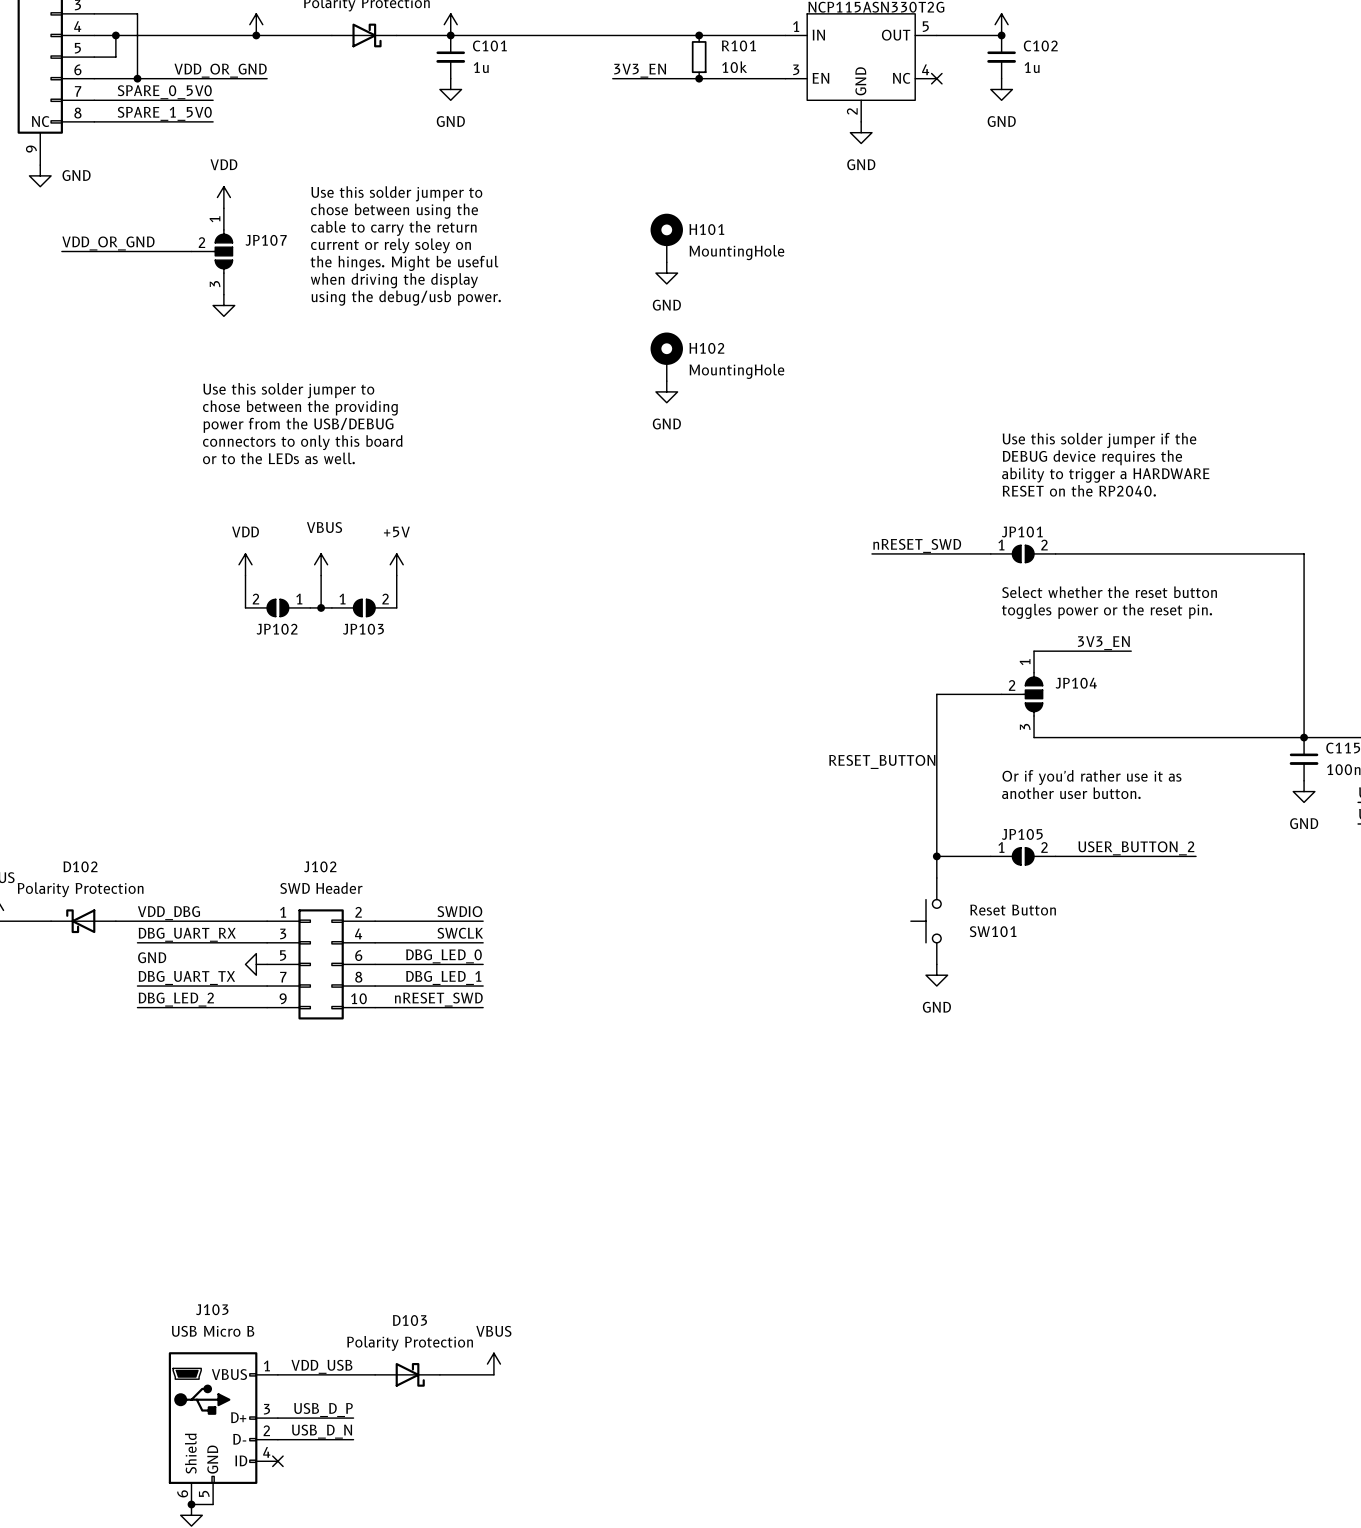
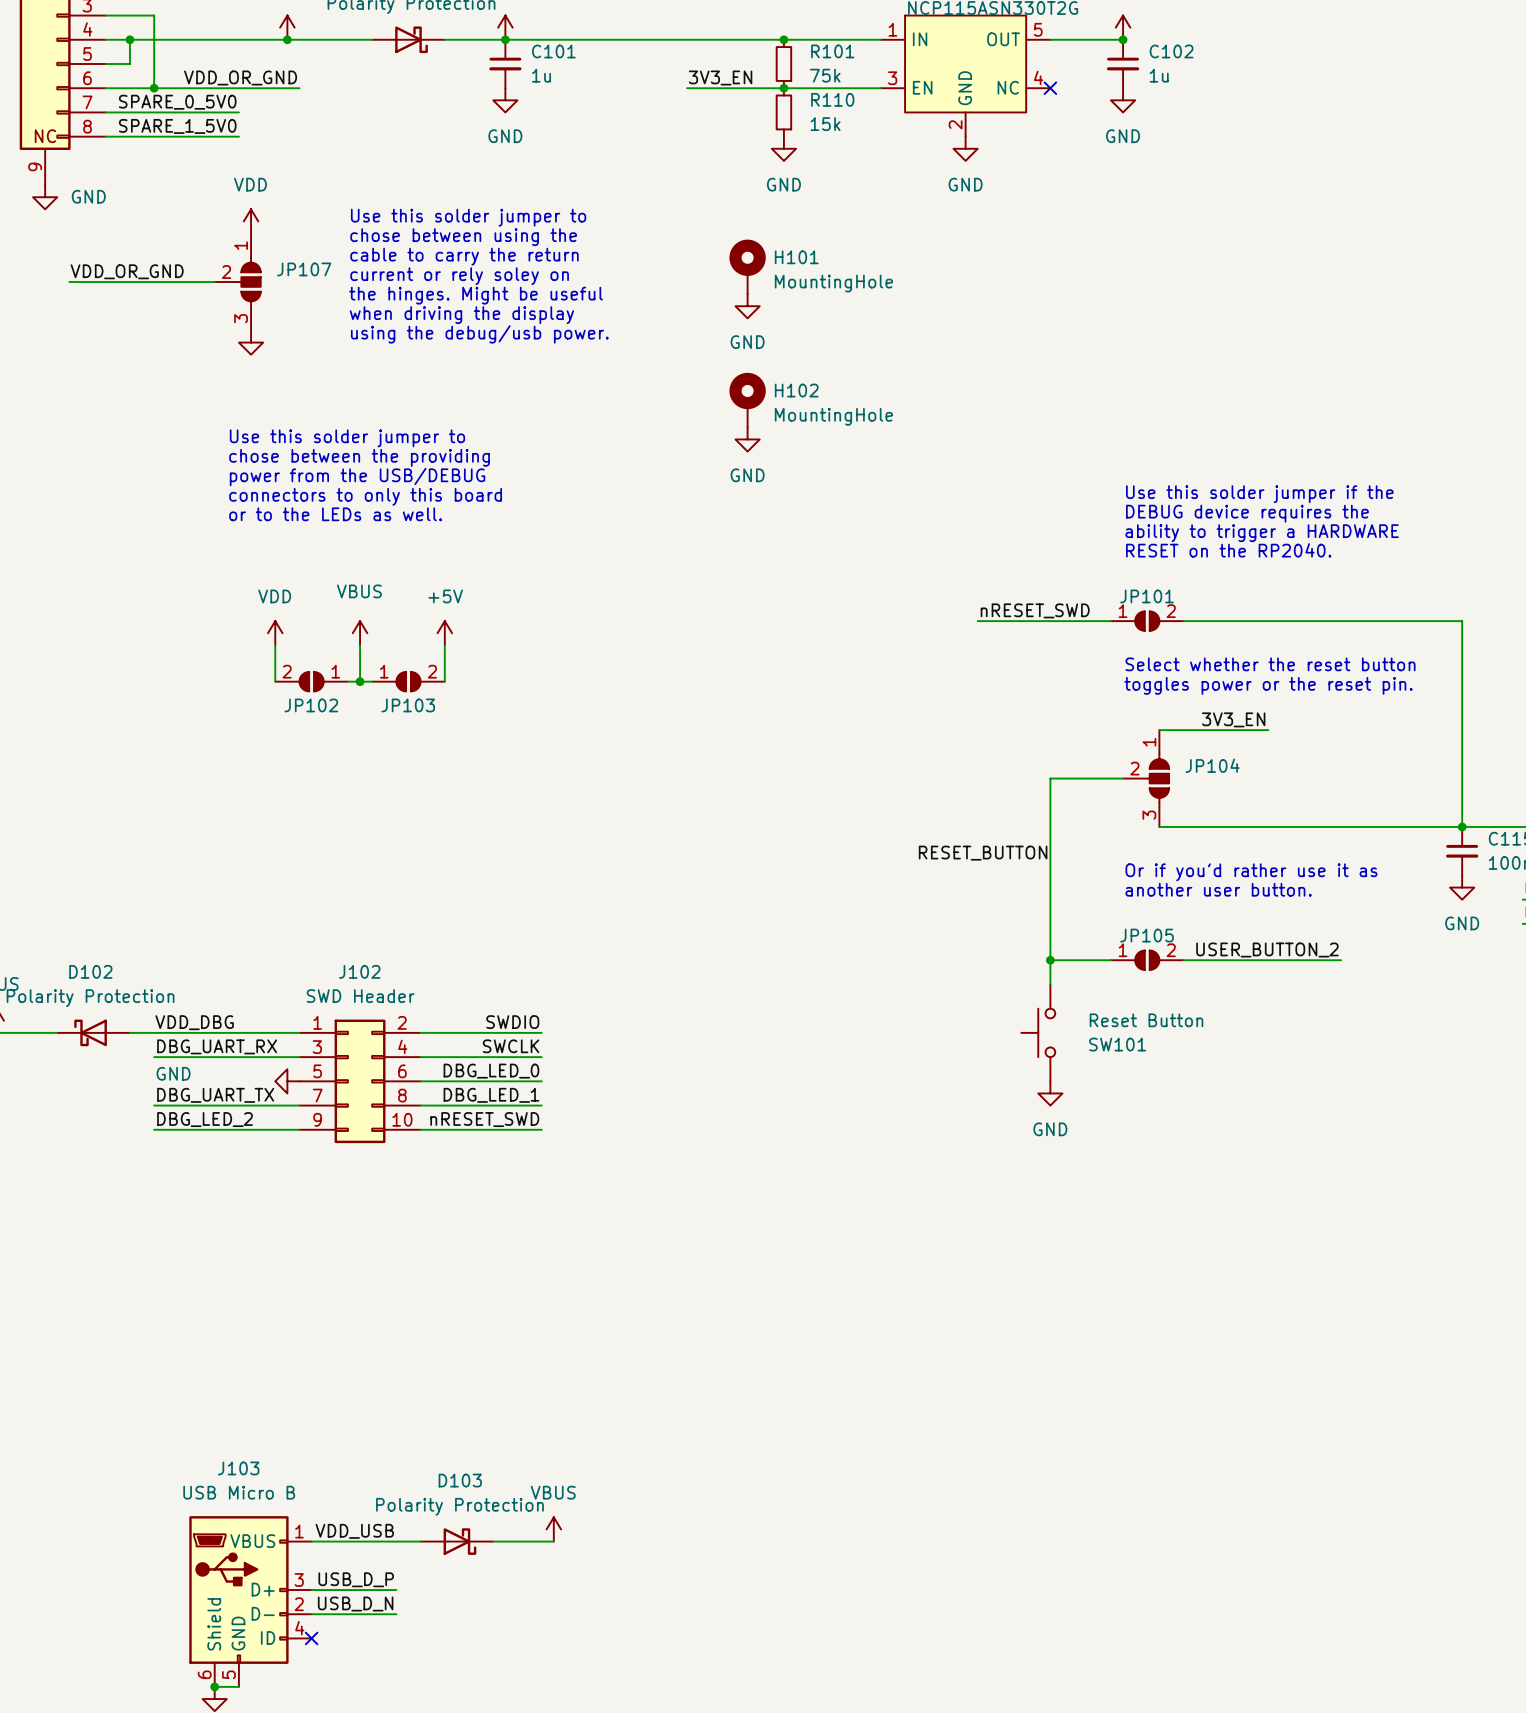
R101 value: 10k (734, 67) -> 75k (825, 75)
R110: none -> 15k (783, 112)
power symbol: none -> GND (783, 148)

